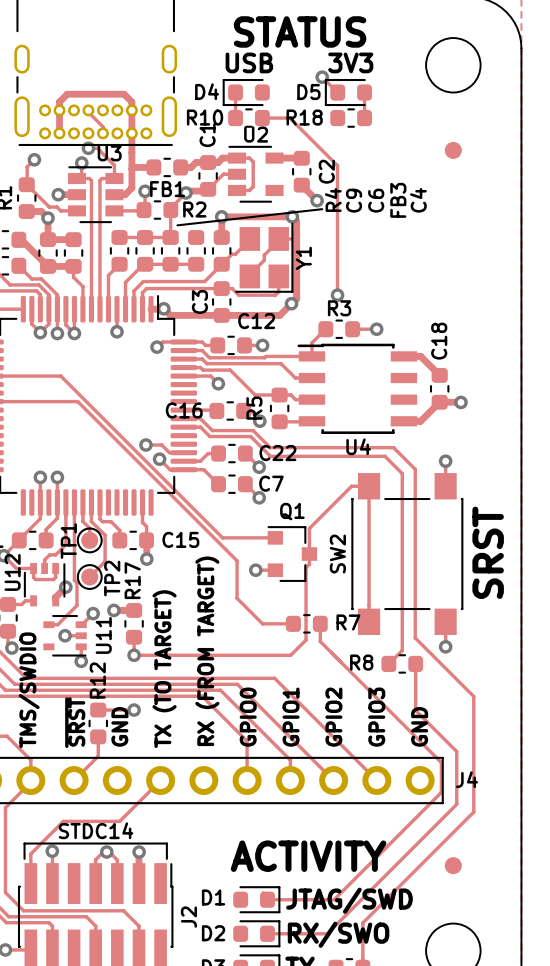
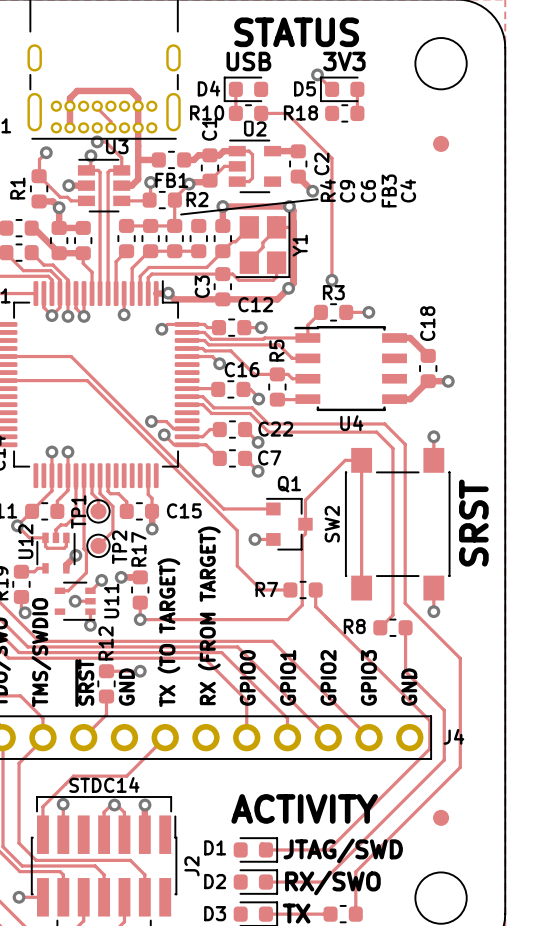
R5 name position: R5 (254, 408) -> R5 (276, 350)
C16 name position: C16 (184, 410) -> C16 (242, 369)
R7 name position: R7 (348, 622) -> R7 (266, 589)

